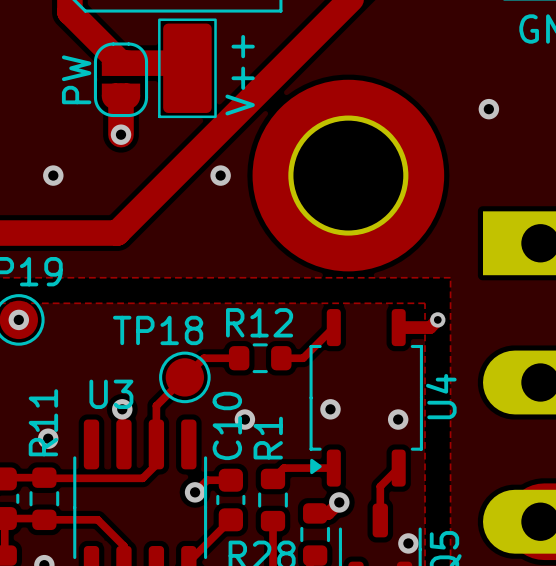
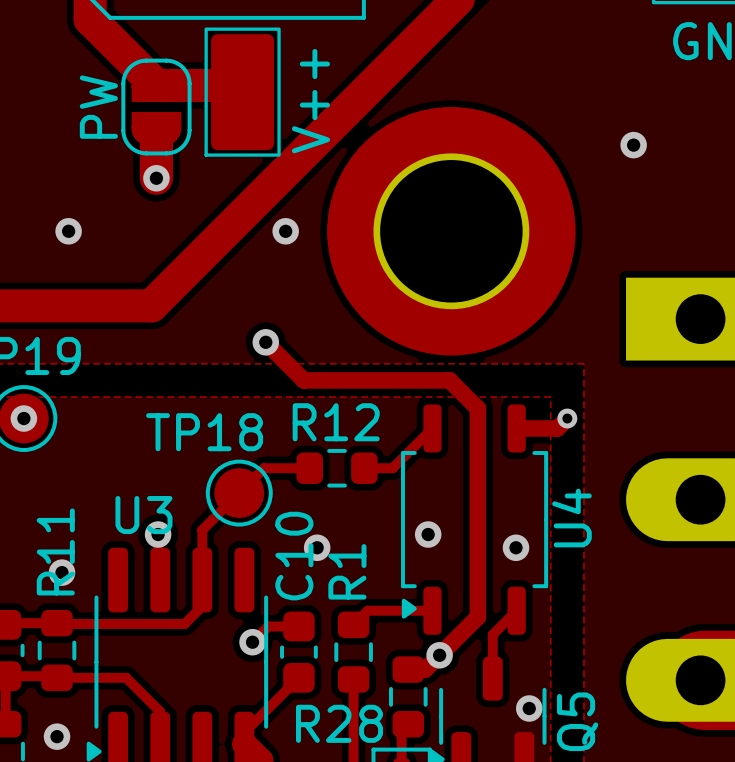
track: none -> (265, 342) (303, 380) (449, 380) (477, 408) (477, 617) (439, 655)
via: none -> (265, 342)

